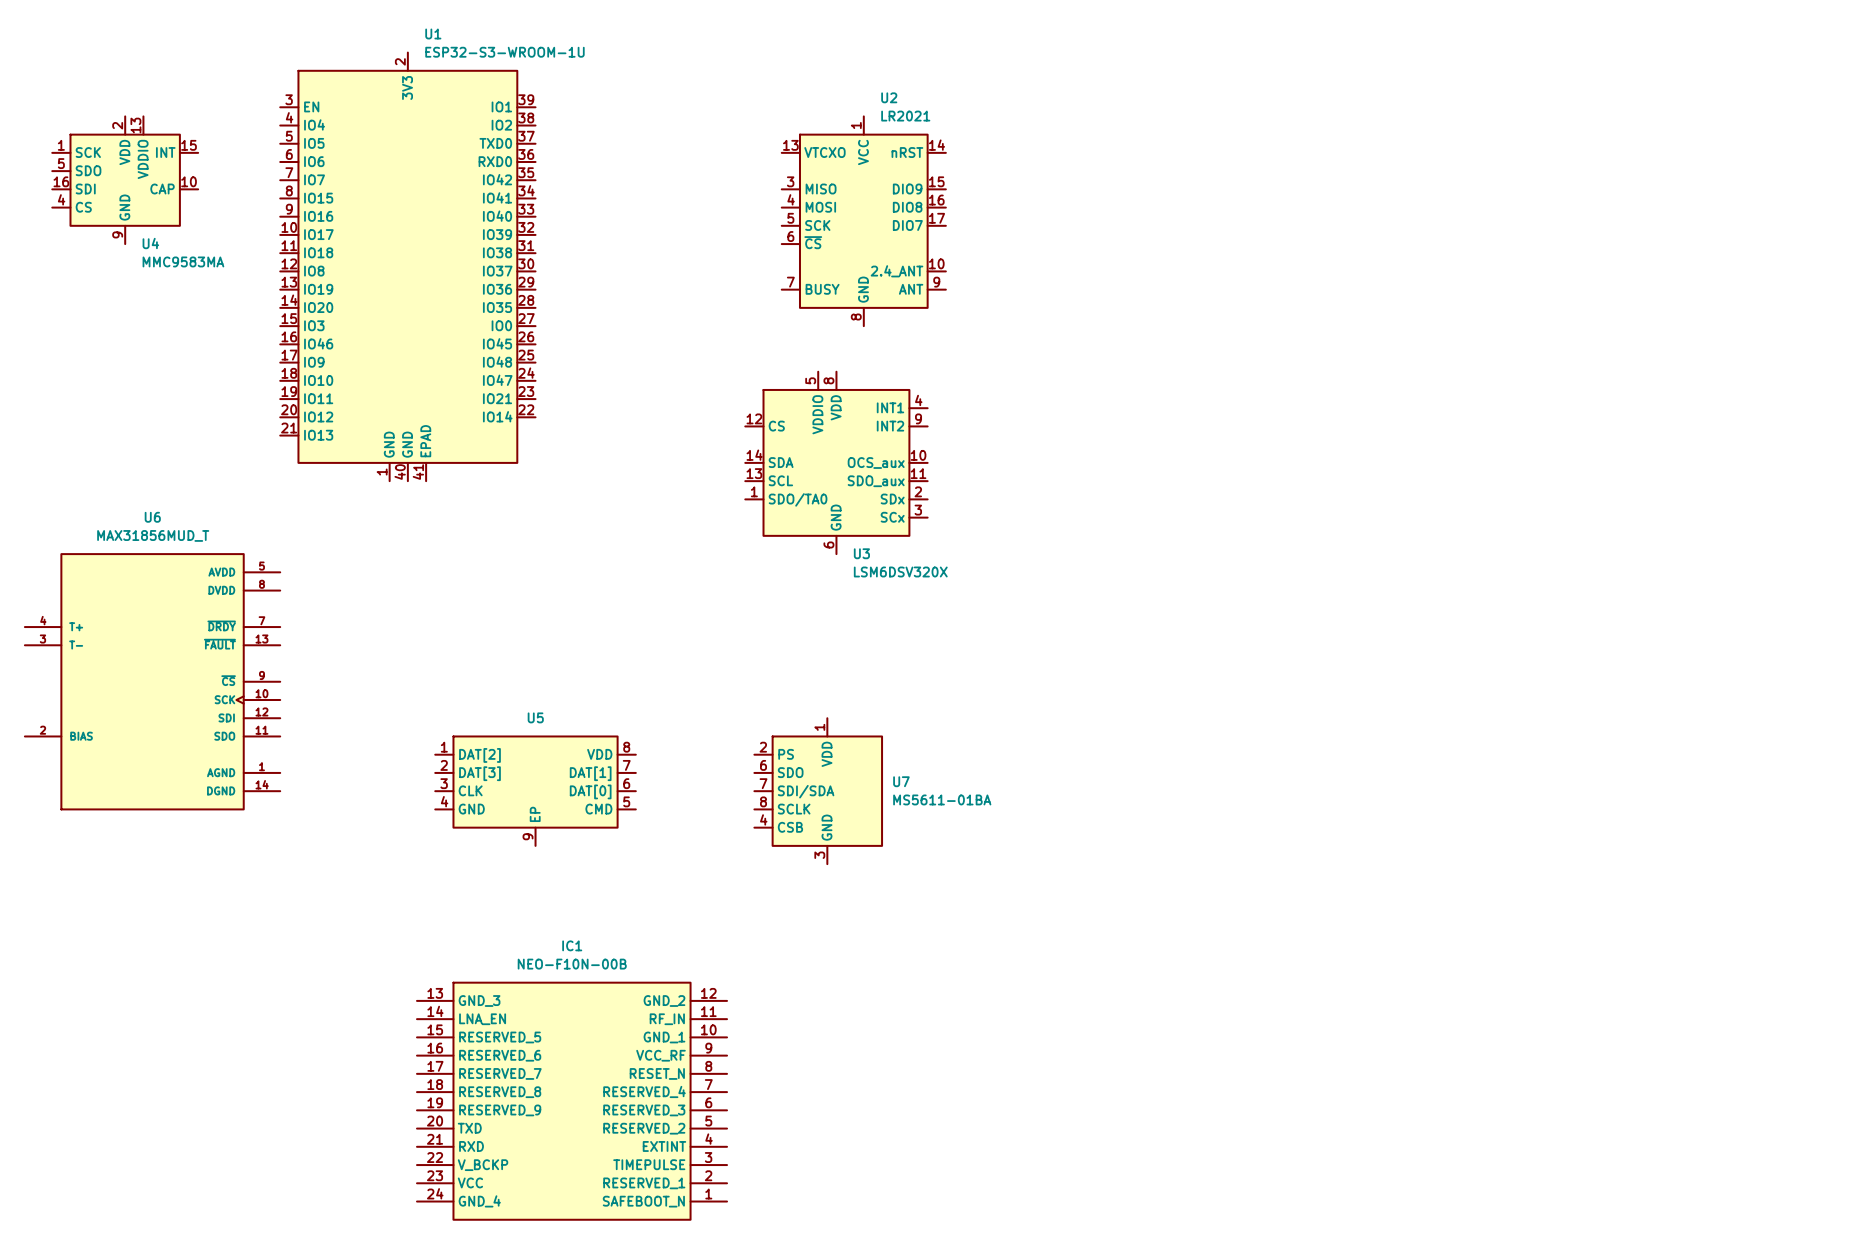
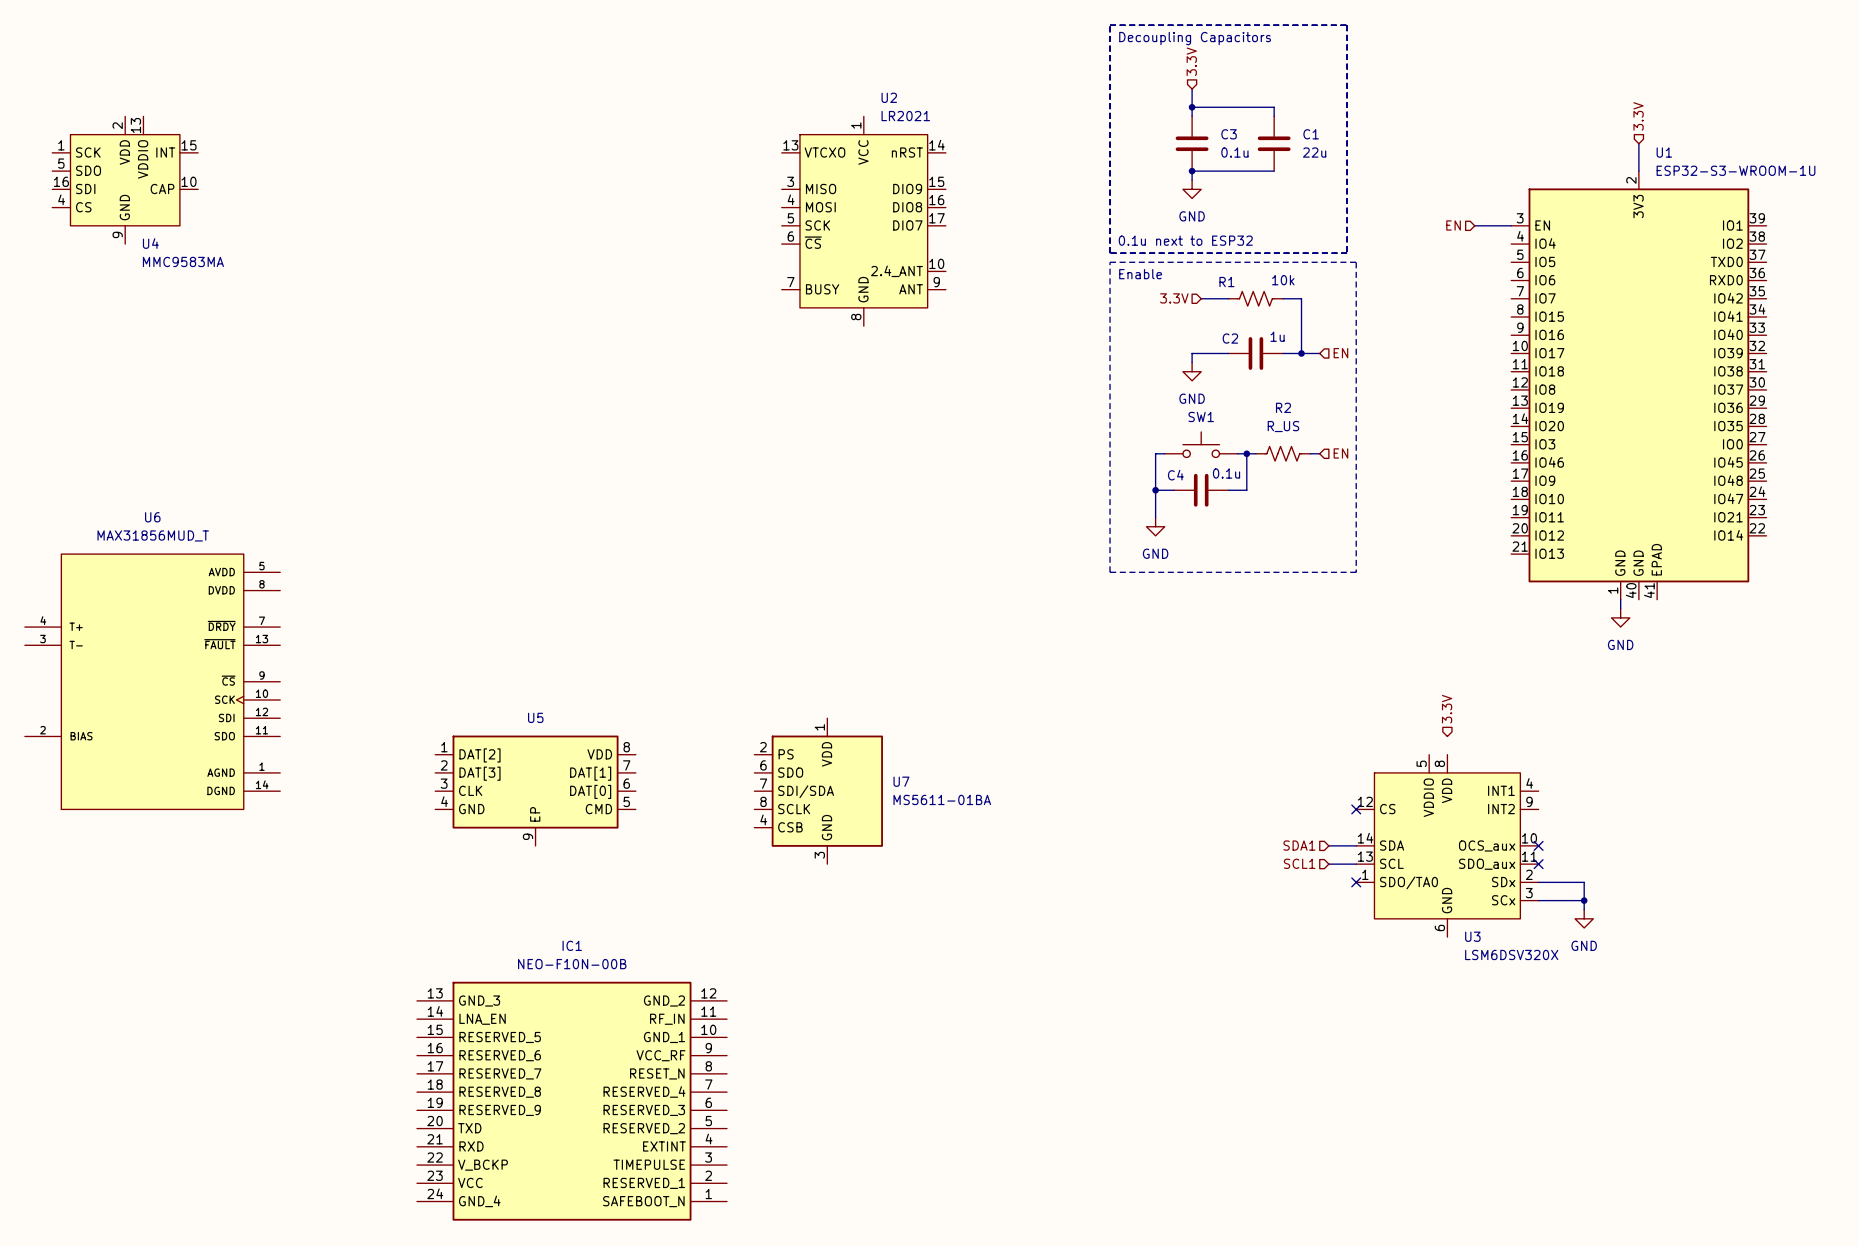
line: none -> (1110, 25) (1347, 25) (1347, 253) (1110, 253) (1110, 25)
text: none -> Decoupling Capacitors (1195, 38)
hierarchical label: none -> 3.3V (1191, 61)
wire: none -> (1192, 89) (1192, 116)
wire: none -> (1192, 107) (1274, 107) (1274, 116)
junction: none -> (1192, 107)
hierarchical label: none -> 3.3V (1638, 116)
C3: none -> 0.1u (1192, 143)
C1: none -> 22u (1274, 143)
wire: none -> (1638, 143) (1638, 171)
junction: none -> (1192, 171)
wire: none -> (1274, 171) (1192, 171) (1192, 180)
power symbol: none -> GND (1192, 189)
hierarchical label: none -> EN (1453, 225)
wire: none -> (1474, 225) (1511, 225)
text: none -> 0.1u next to ESP32 (1185, 240)
line: none -> (1110, 262) (1110, 572) (1356, 572) (1356, 262) (1110, 262)
U1 position: (407, 266) -> (1638, 385)
text: none -> Enable (1140, 274)
hierarchical label: none -> 3.3V (1174, 298)
wire: none -> (1201, 298) (1228, 298)
R1: none -> 10k (1255, 298)
wire: none -> (1283, 298) (1301, 298) (1301, 353)
wire: none -> (1228, 353) (1192, 353) (1192, 362)
C2: none -> 1u (1255, 353)
wire: none -> (1283, 353) (1319, 353)
junction: none -> (1301, 353)
hierarchical label: none -> EN (1340, 353)
power symbol: none -> GND (1192, 371)
SW1: none -> (1201, 444)
wire: none -> (1164, 453) (1155, 453) (1155, 517)
wire: none -> (1237, 453) (1255, 453)
wire: none -> (1246, 453) (1246, 490) (1228, 490)
junction: none -> (1246, 453)
R2: none -> R_US (1283, 453)
wire: none -> (1310, 453) (1319, 453)
hierarchical label: none -> EN (1340, 453)
U3 position: (836, 462) -> (1447, 845)
wire: none -> (1155, 490) (1173, 490)
junction: none -> (1155, 490)
C4: none -> 0.1u (1201, 490)
power symbol: none -> GND (1155, 526)
wire: none -> (1620, 599) (1620, 608)
power symbol: none -> GND (1620, 617)
hierarchical label: none -> 3.3V (1447, 709)
no-connect mark: none -> (1356, 809)
hierarchical label: none -> SDA1 (1299, 845)
wire: none -> (1328, 845) (1356, 845)
no-connect mark: none -> (1538, 845)
hierarchical label: none -> SCL1 (1299, 863)
wire: none -> (1328, 864) (1356, 864)
no-connect mark: none -> (1538, 864)
no-connect mark: none -> (1356, 882)
wire: none -> (1538, 882) (1584, 882) (1584, 909)
wire: none -> (1538, 900) (1584, 900)
junction: none -> (1584, 900)
power symbol: none -> GND (1584, 918)

